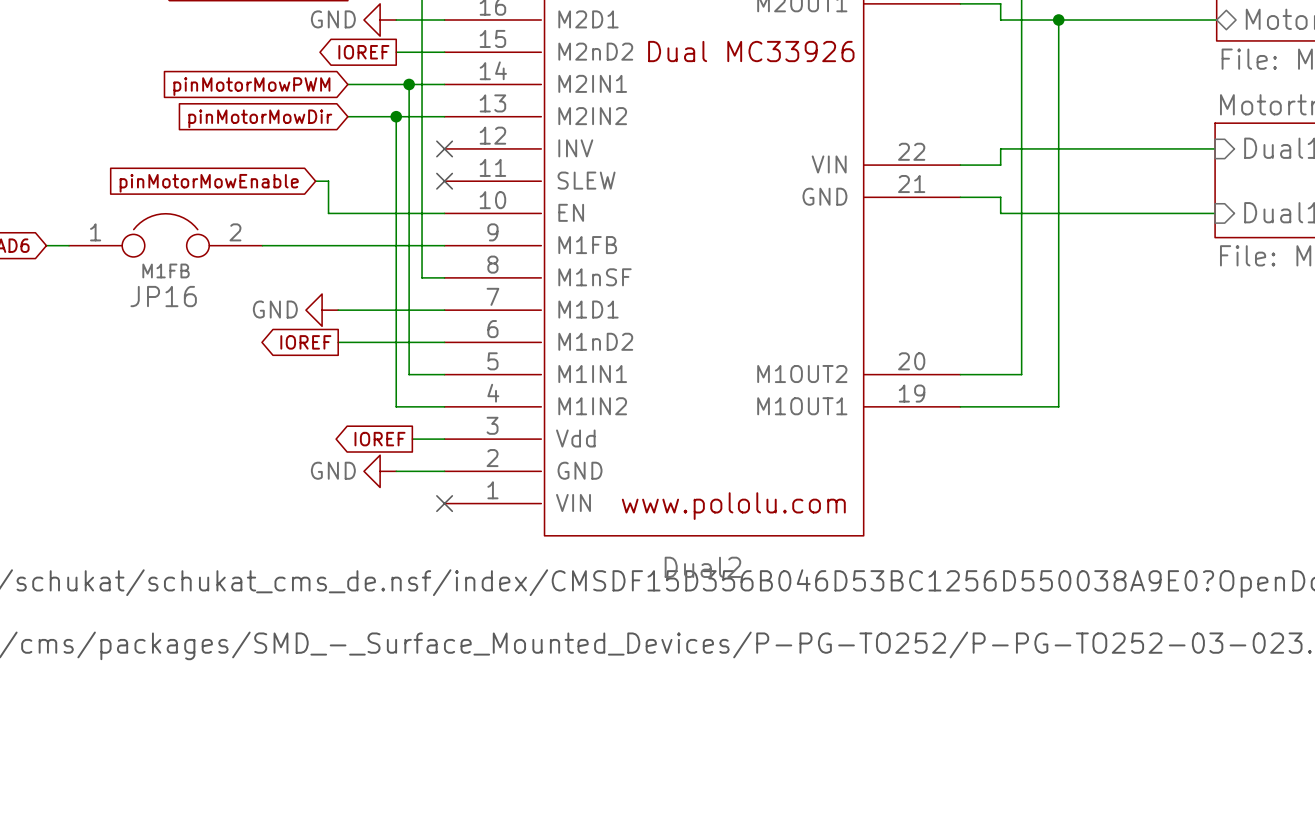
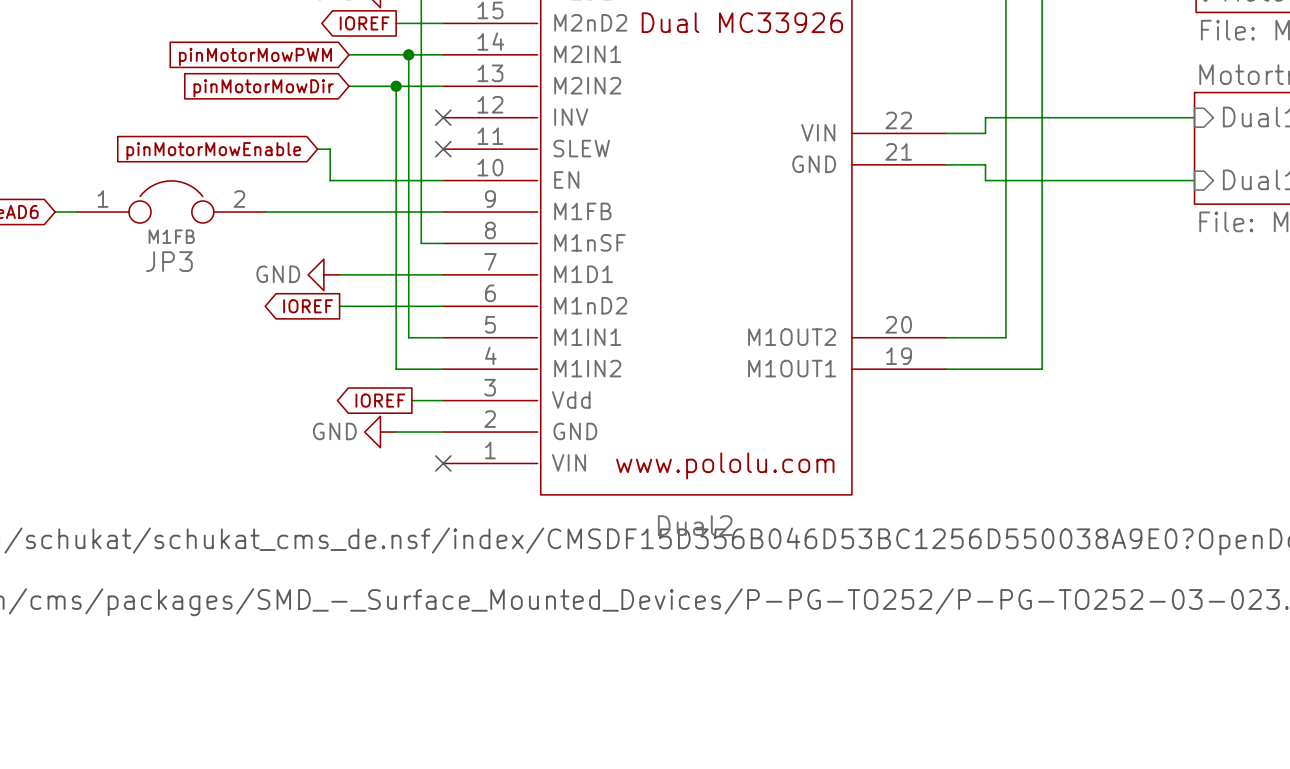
JP16 name: JP16 (163, 296) -> JP3 (169, 261)

